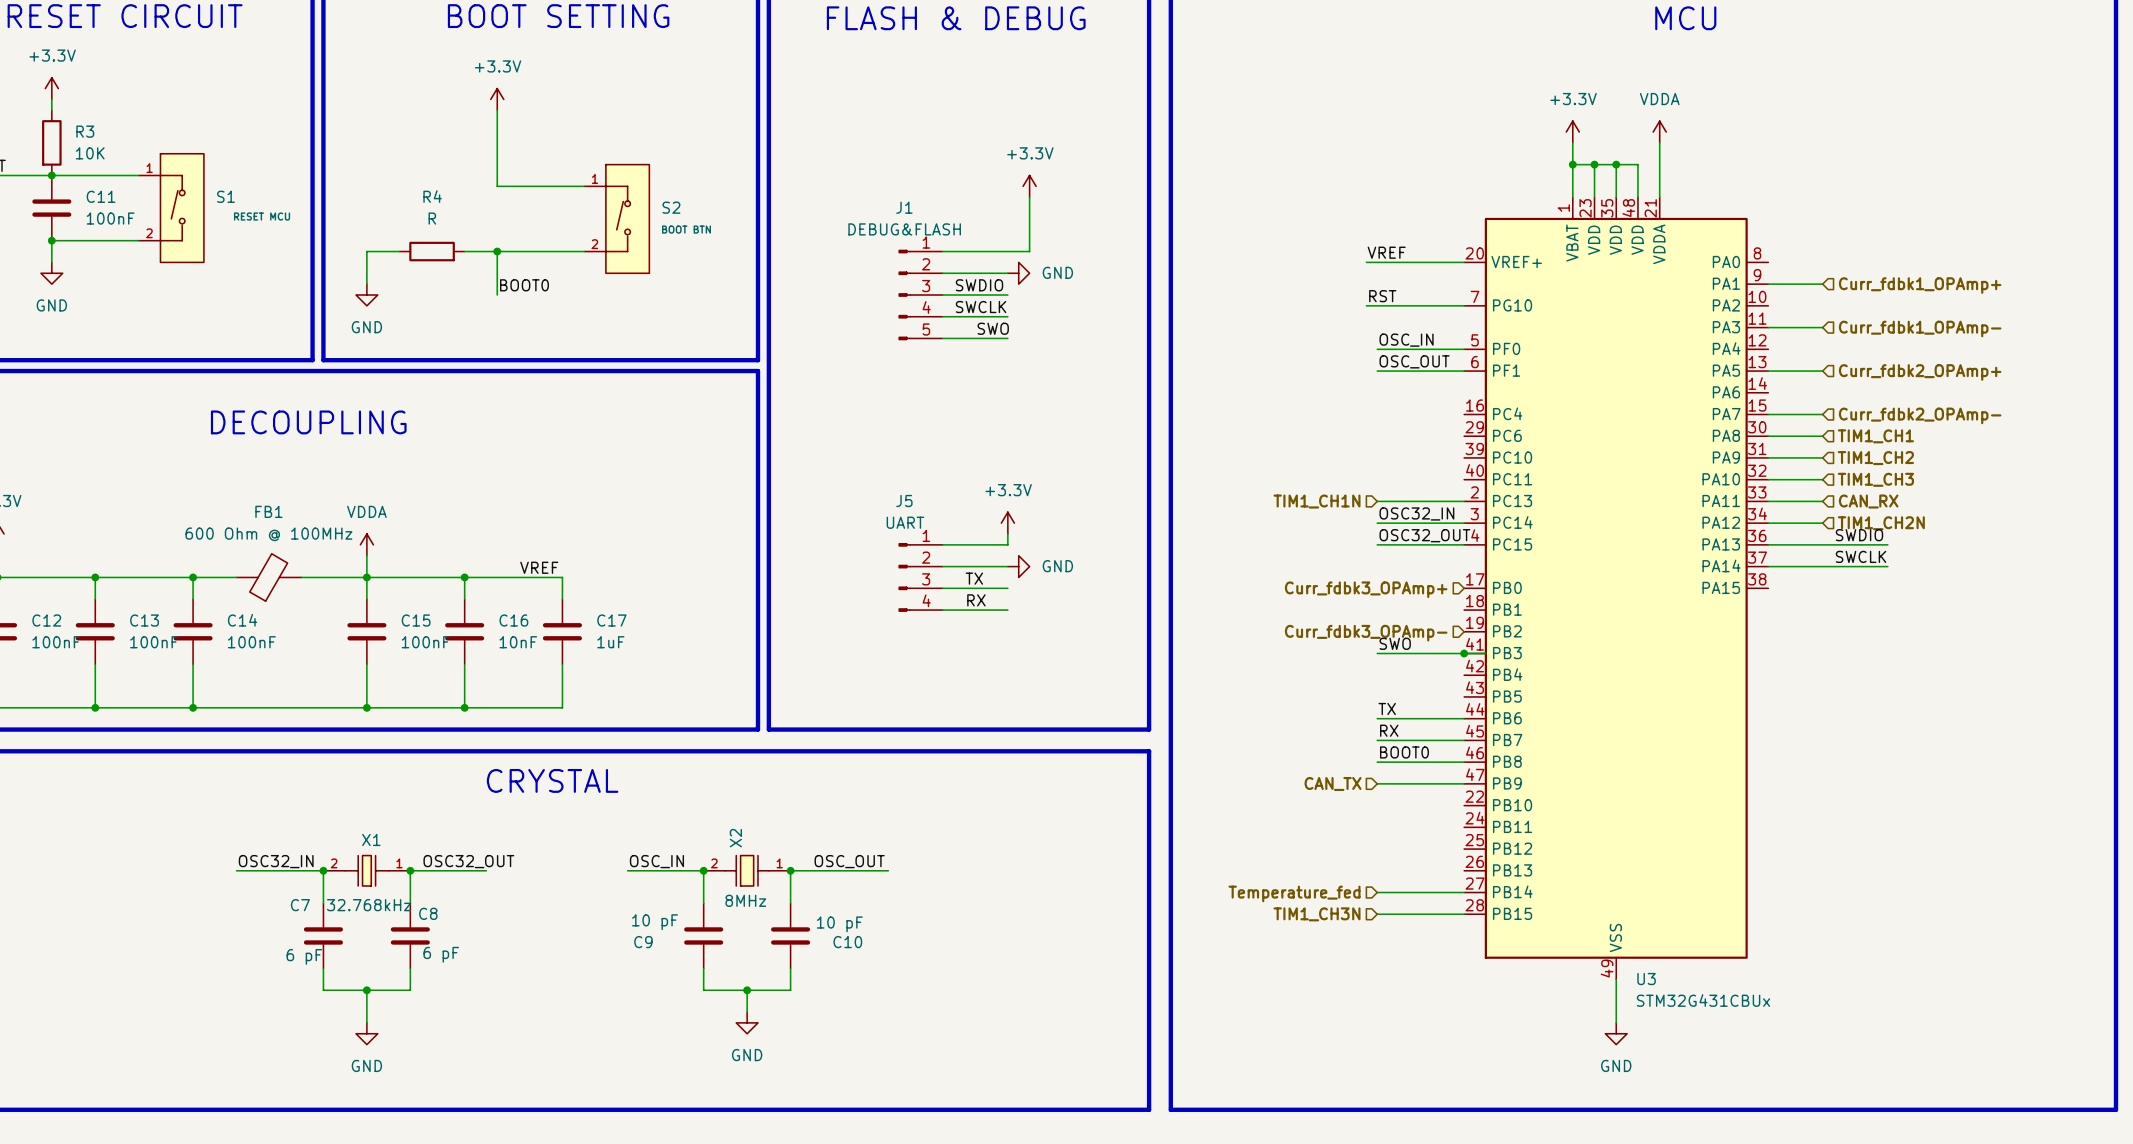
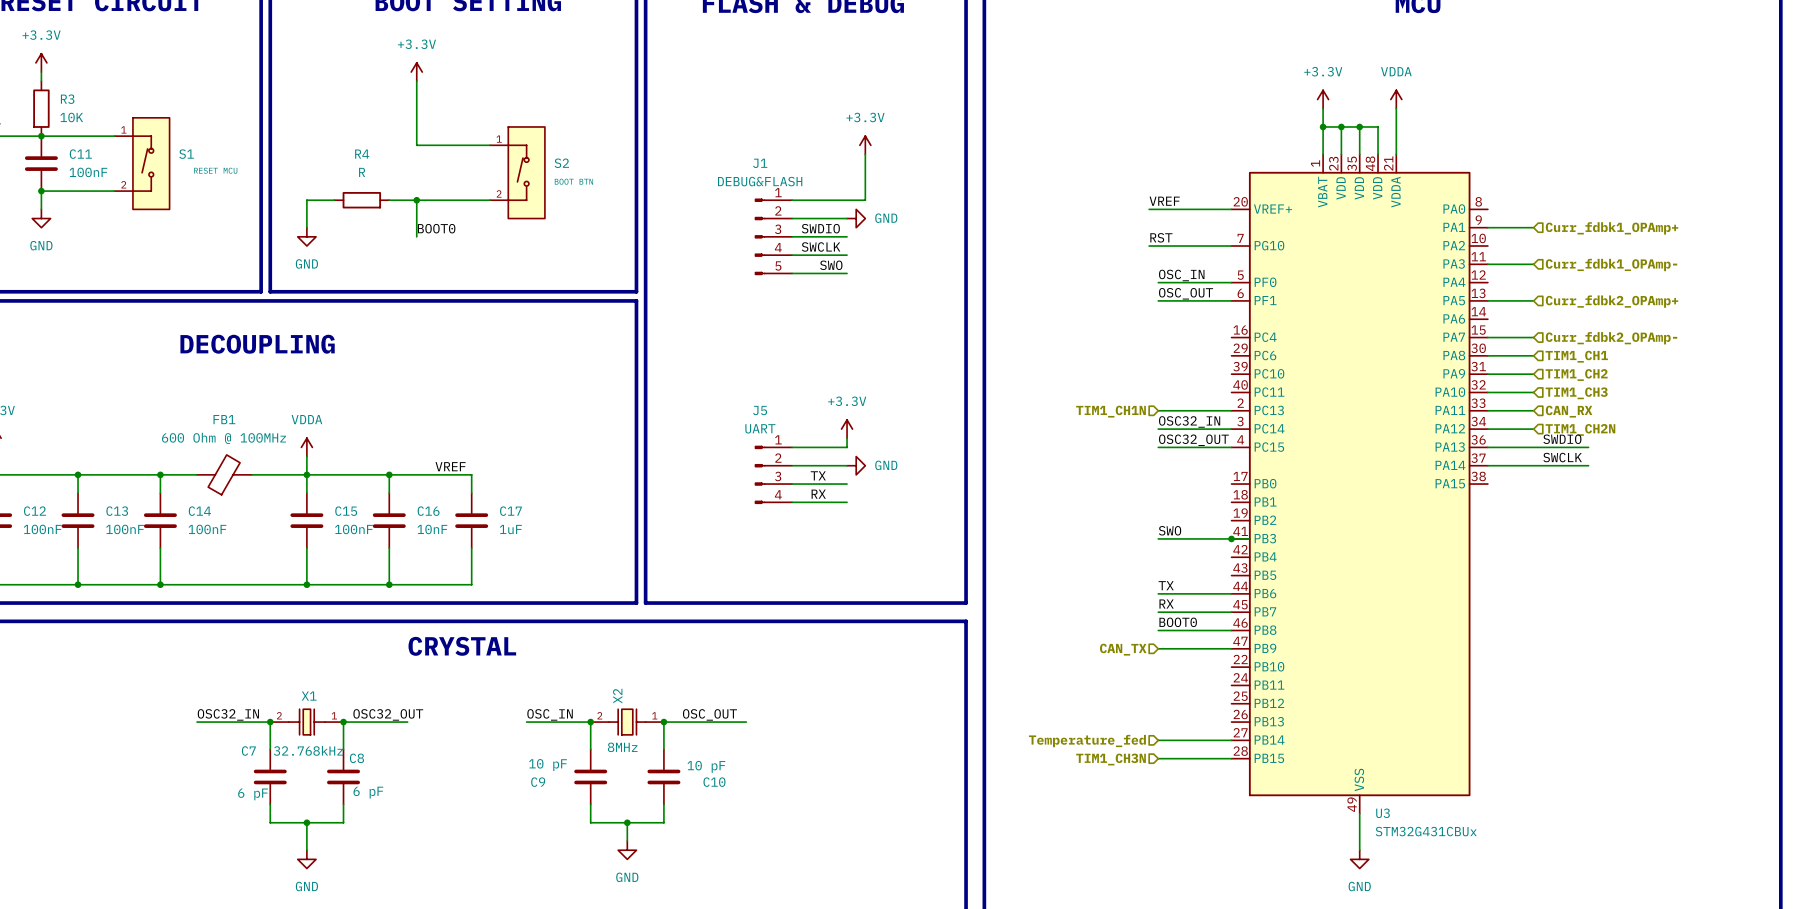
hierarchical label: Curr_fdbk3_OPAmp+ (1366, 589) -> none
hierarchical label: Curr_fdbk3_OPAmp- (1366, 633) -> none

